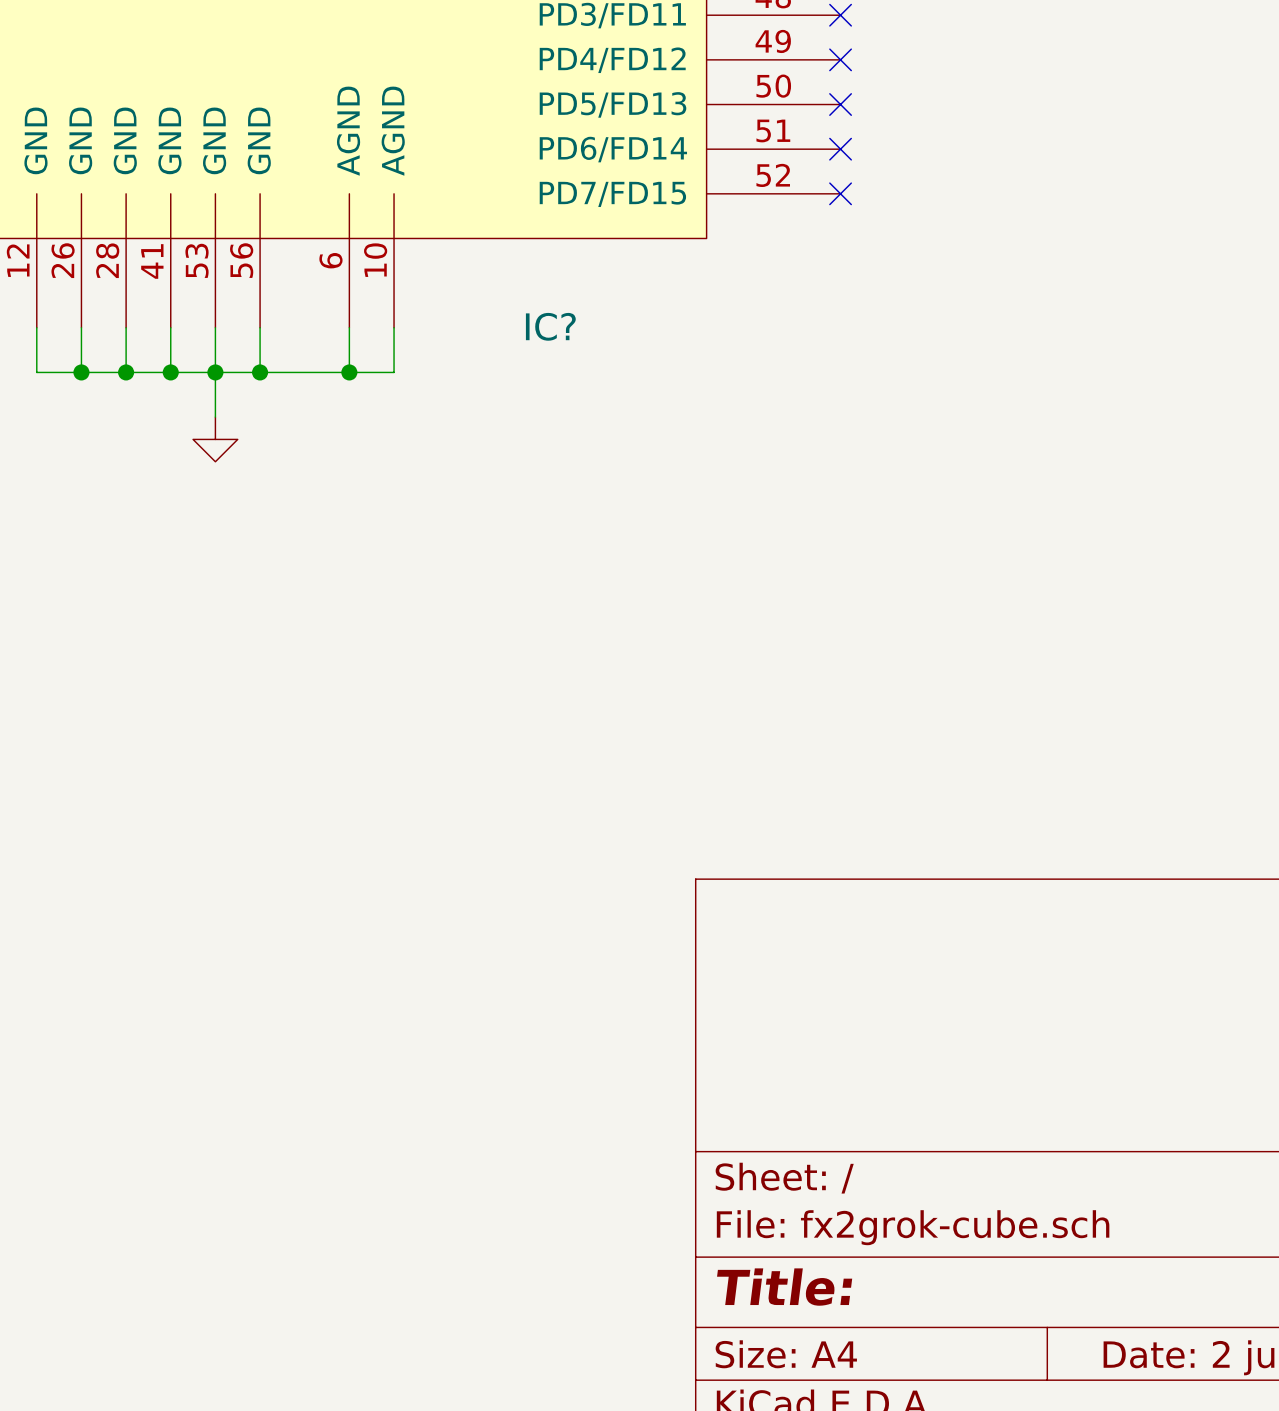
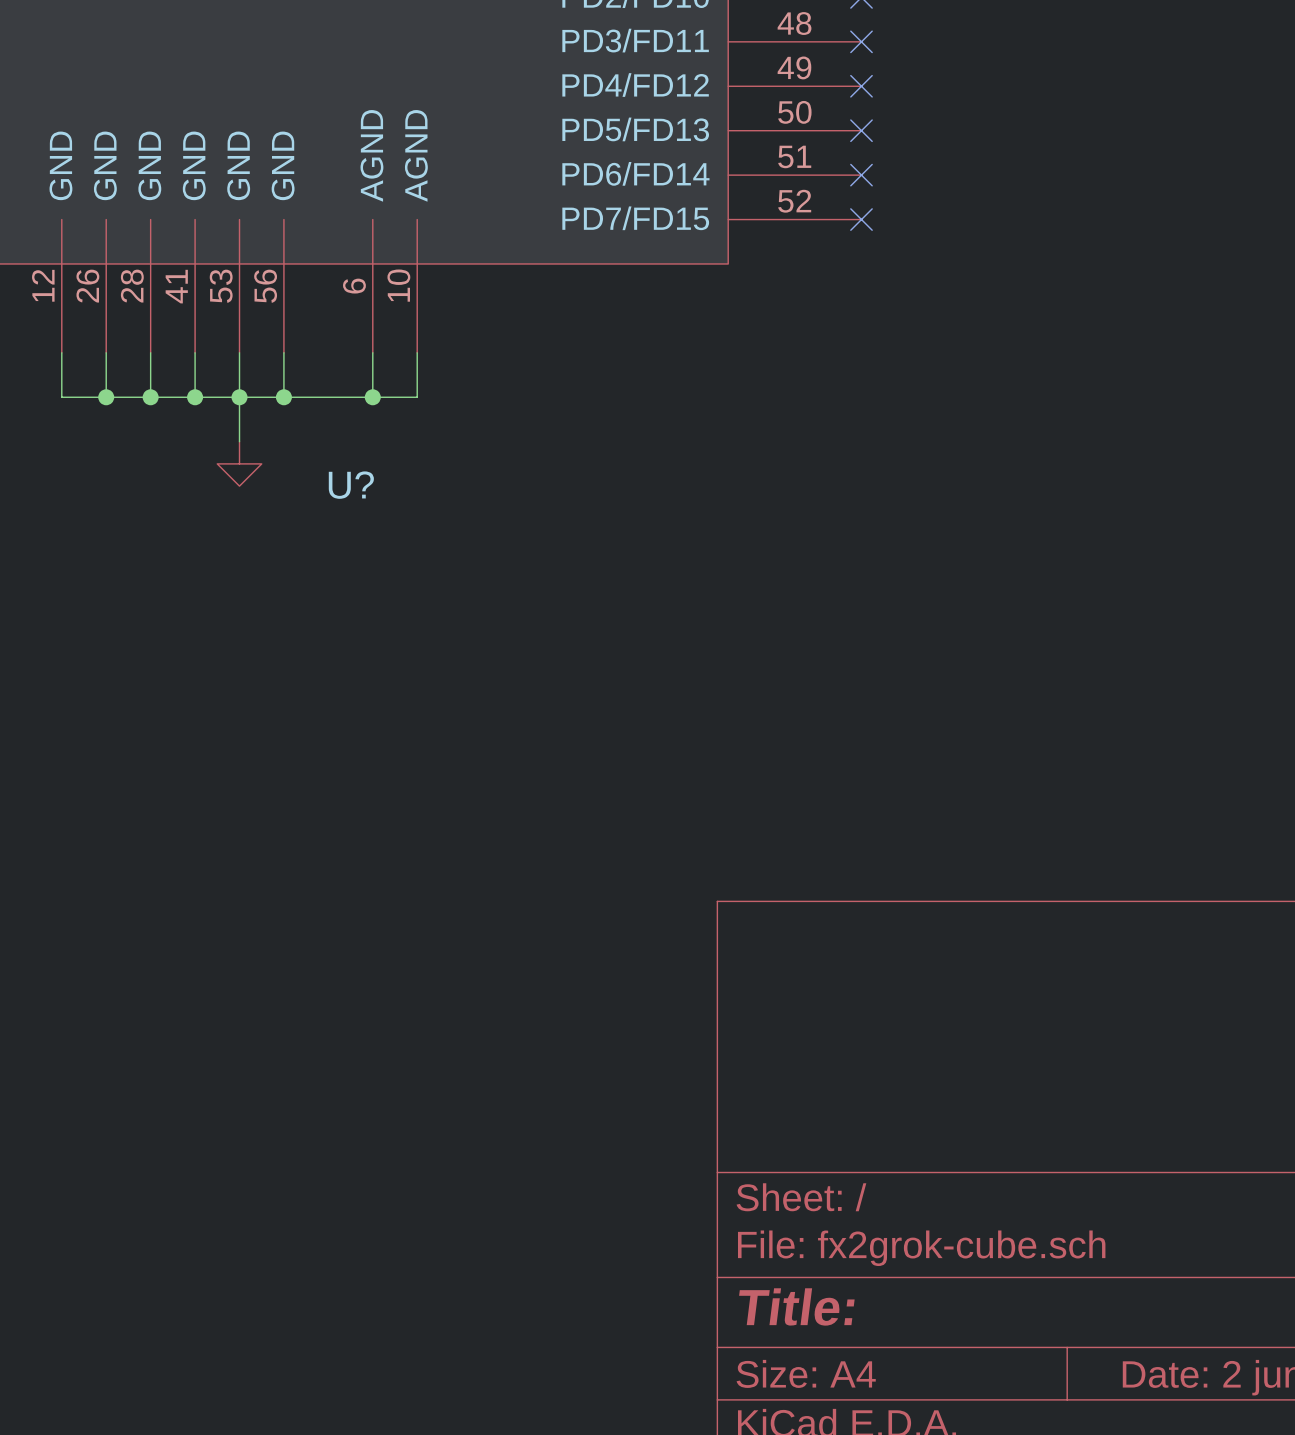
IC? name: IC? (550, 326) -> U? (351, 485)

